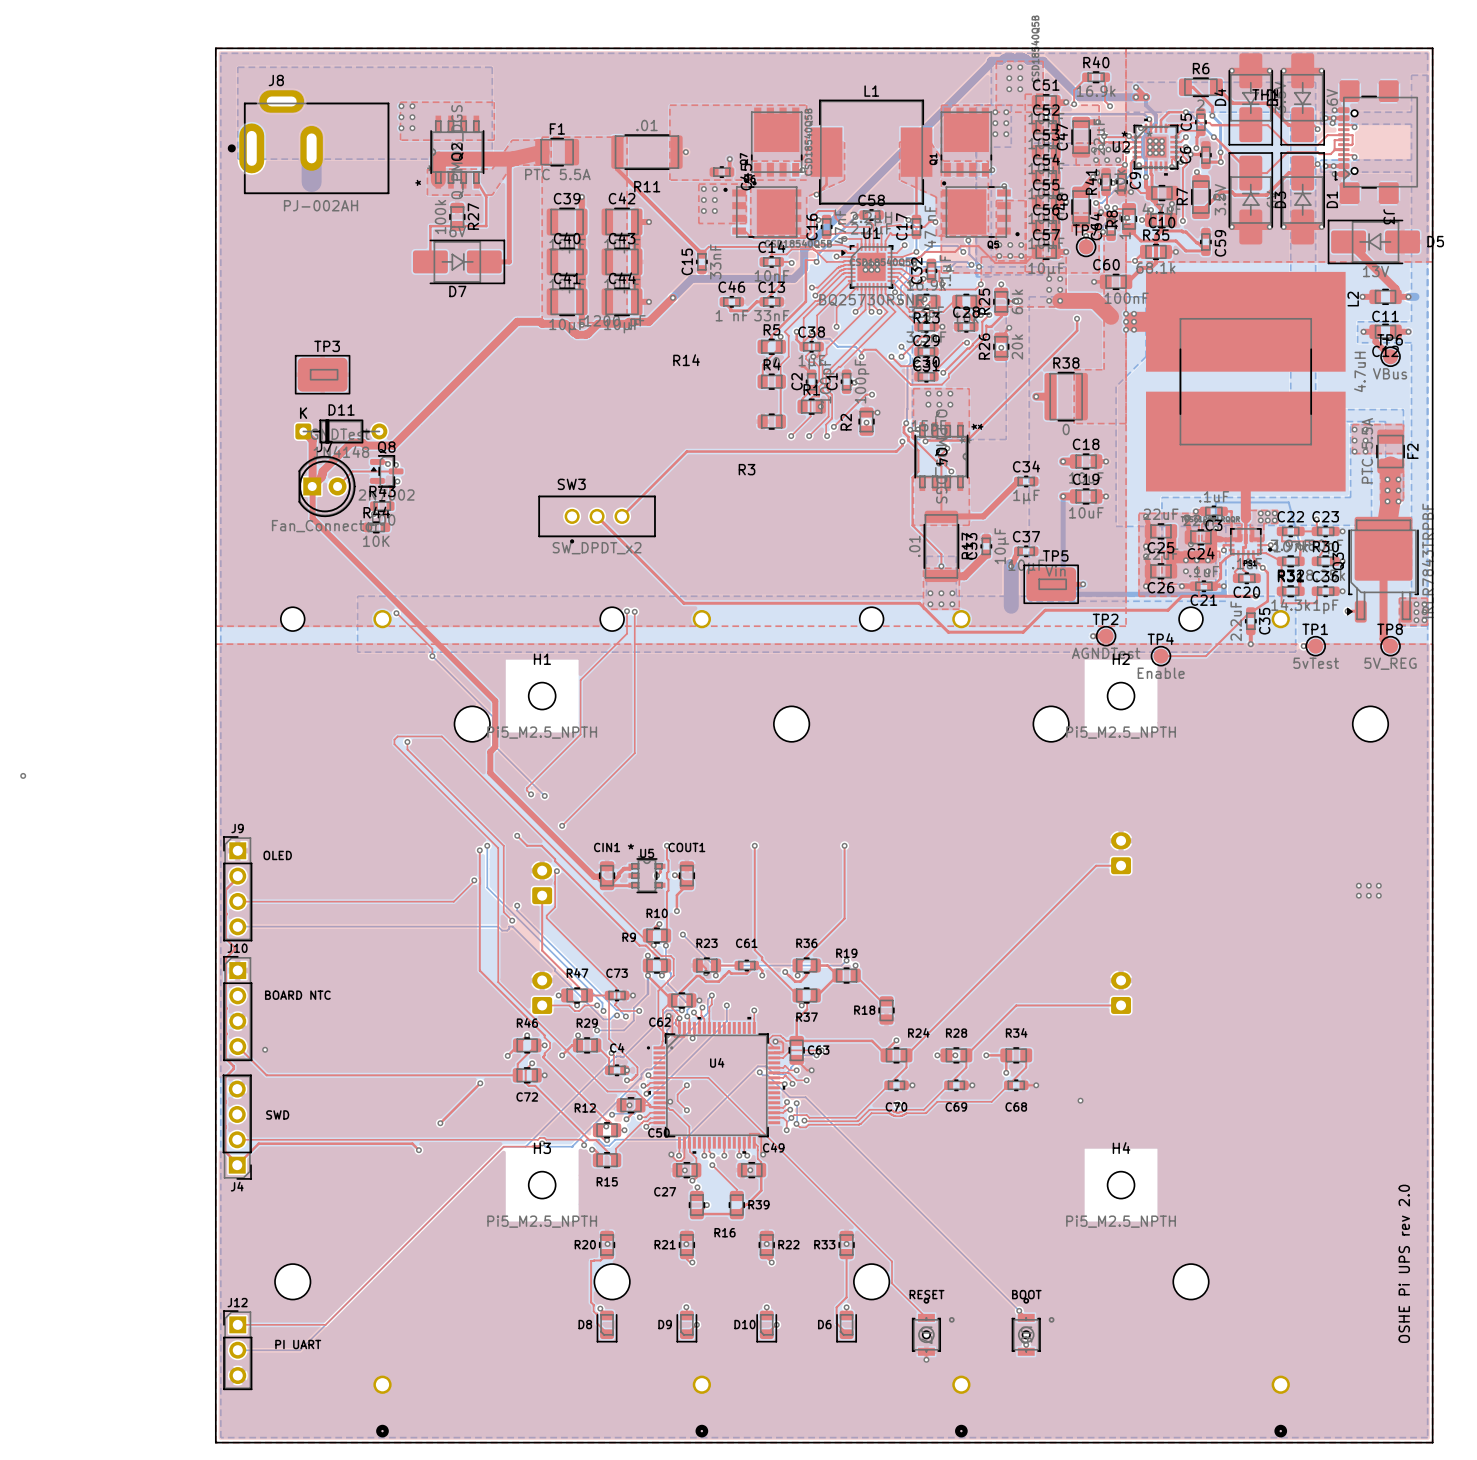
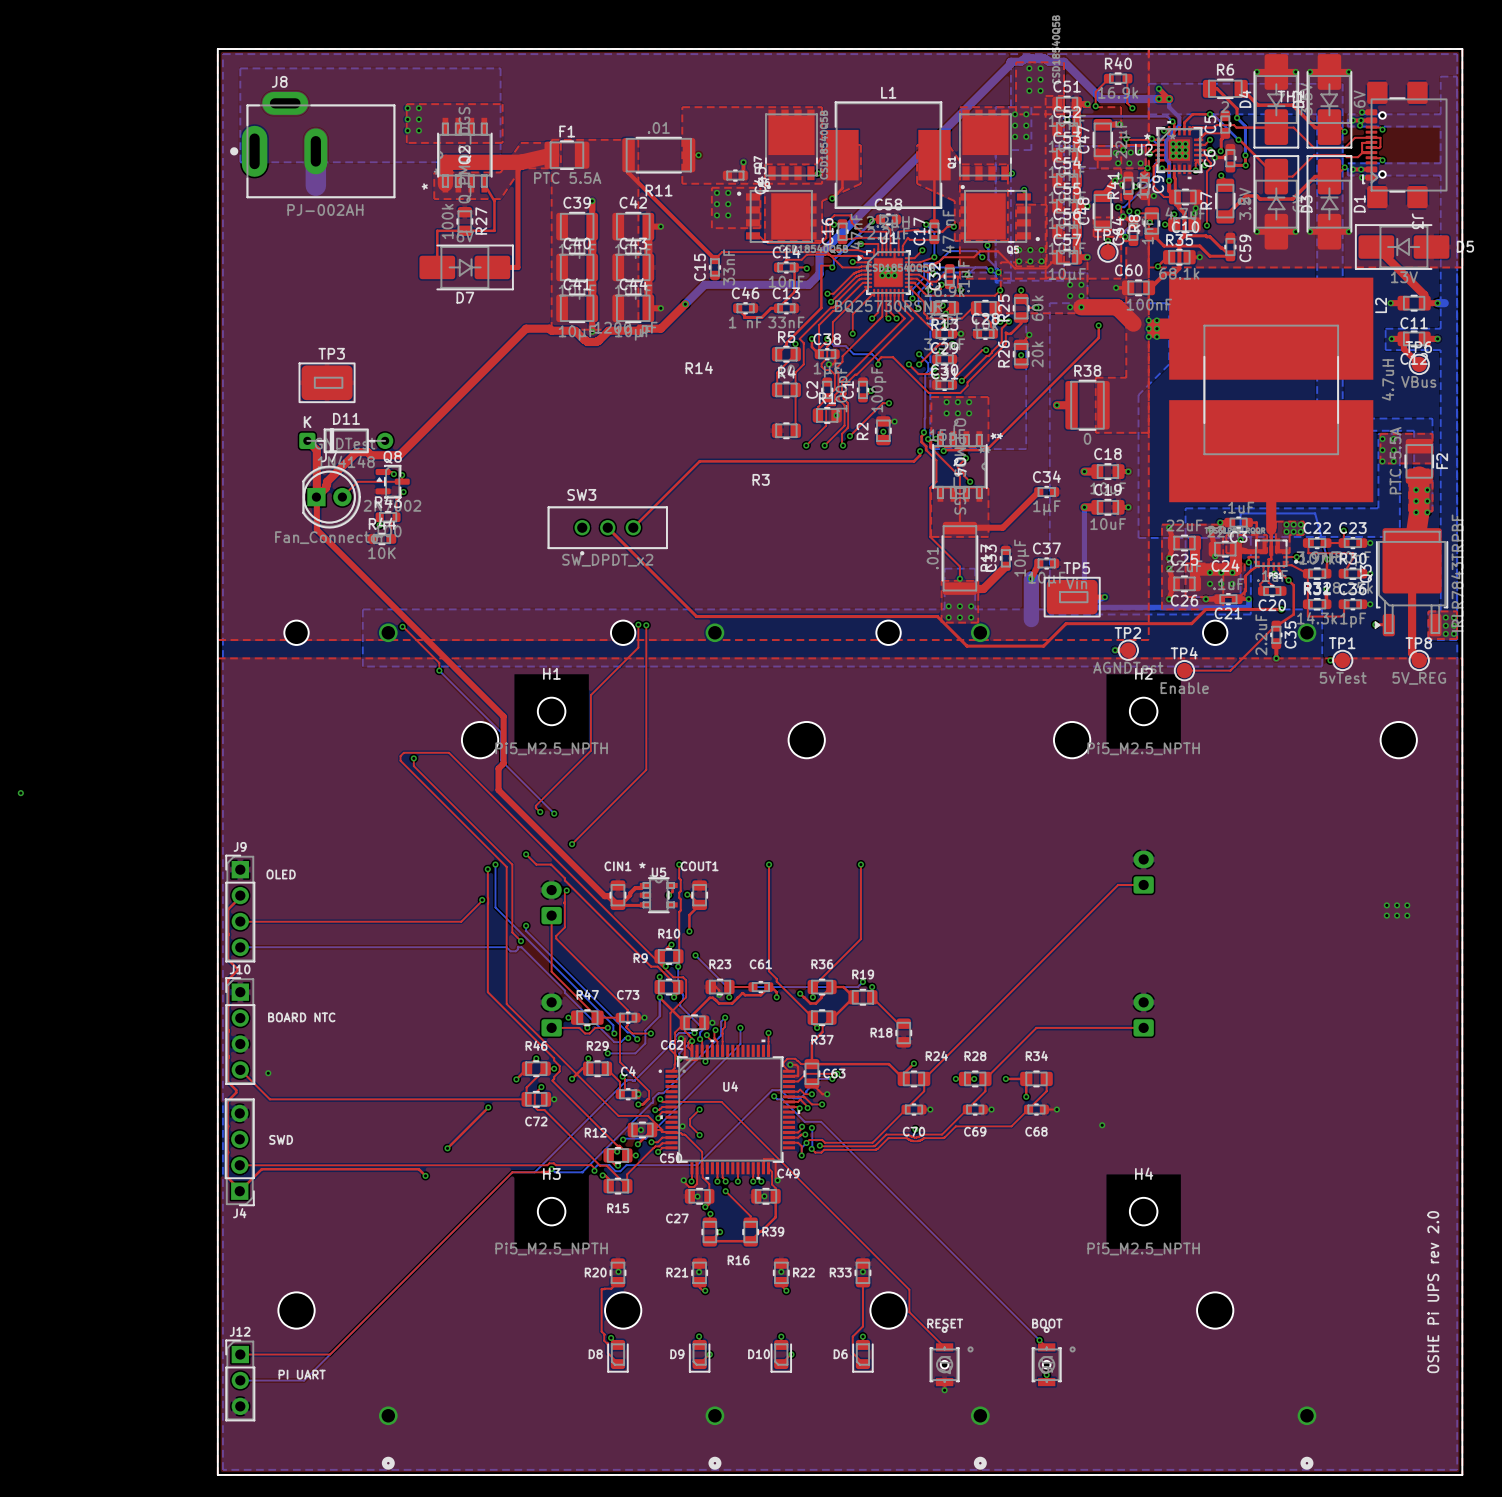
top track: (801, 366) (804, 366) (811, 373) -> none

